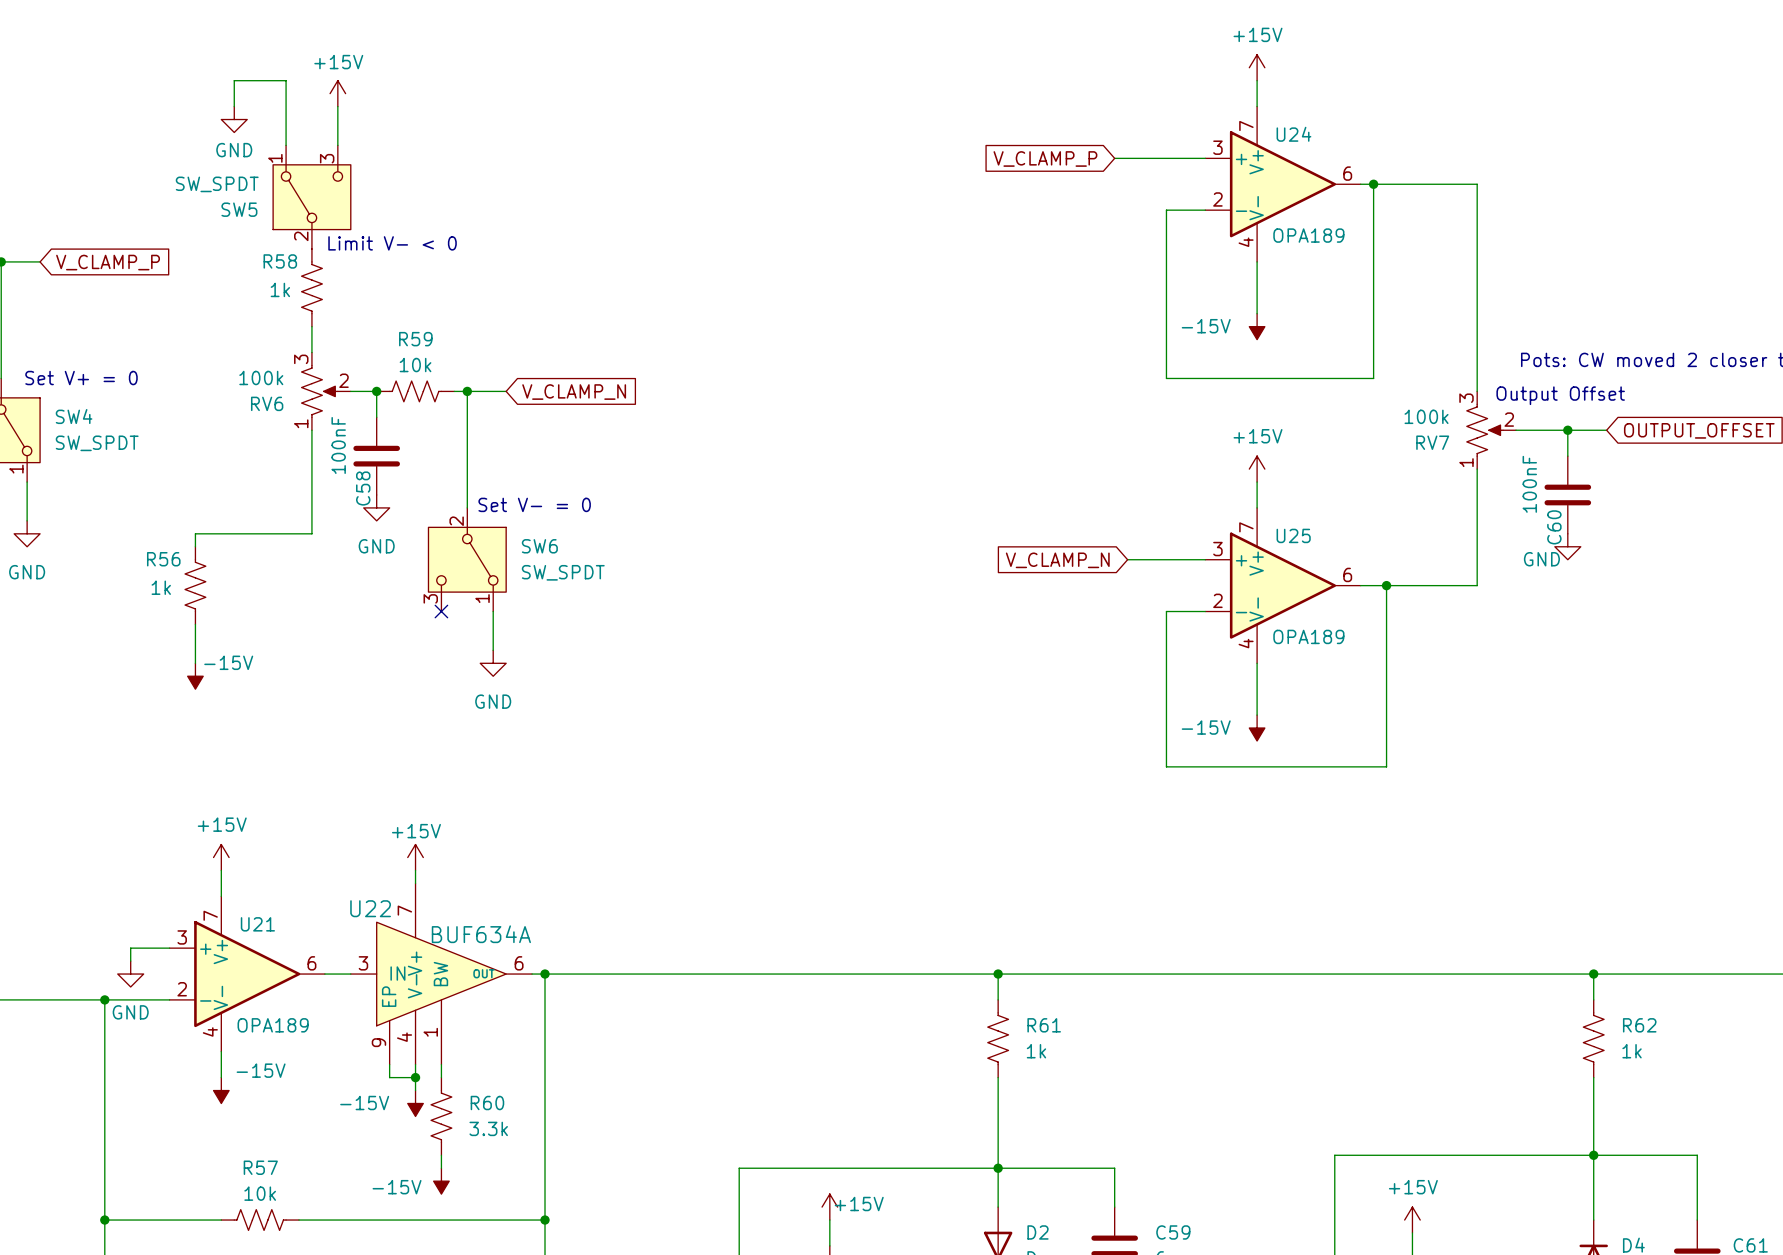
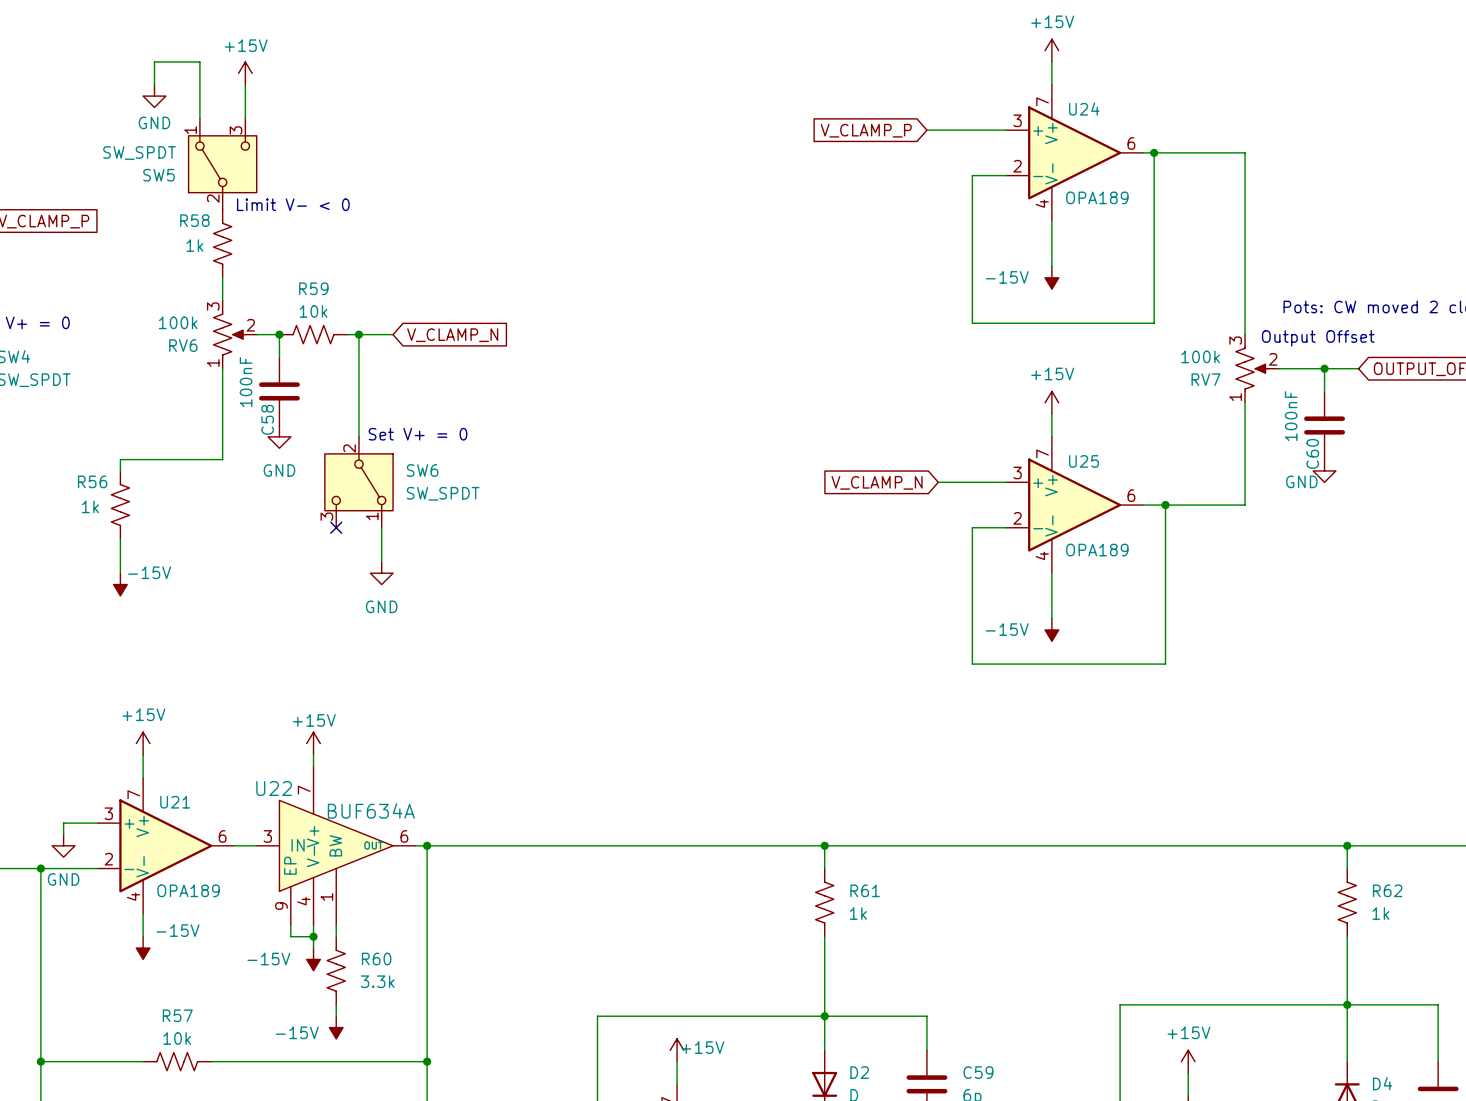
text: Set V- = 0 (534, 504) -> Set V+ = 0 (418, 434)

